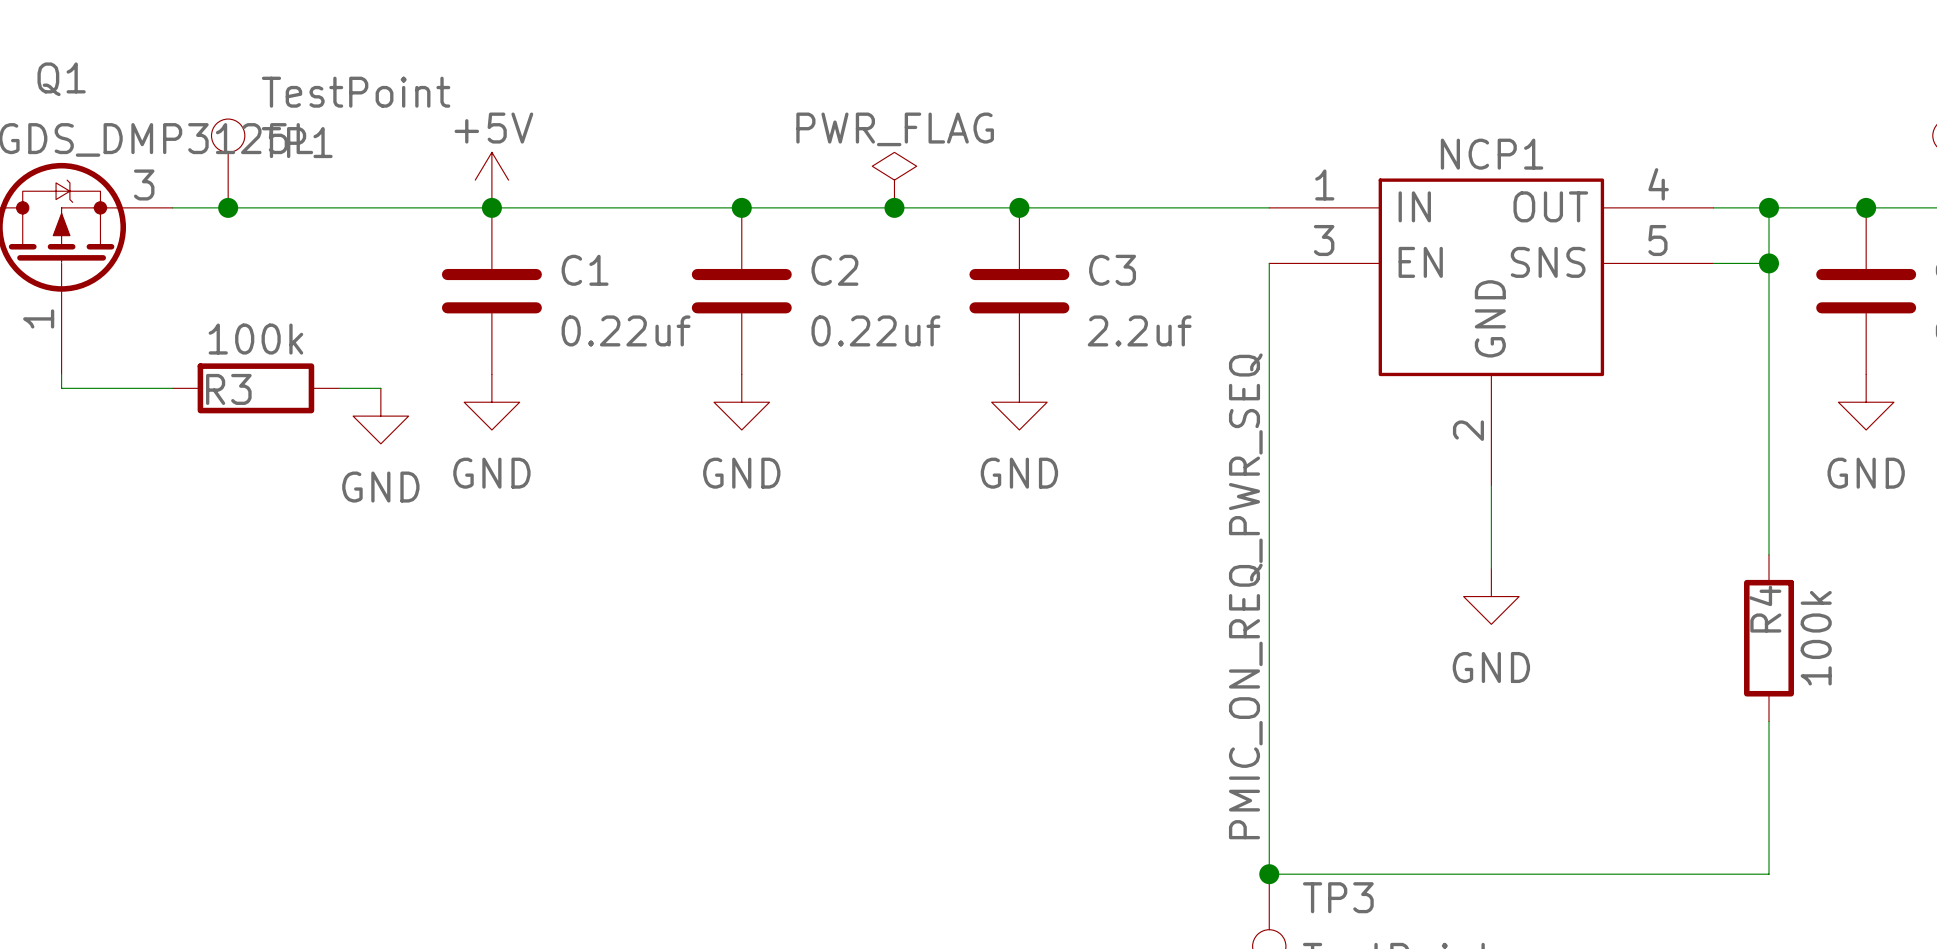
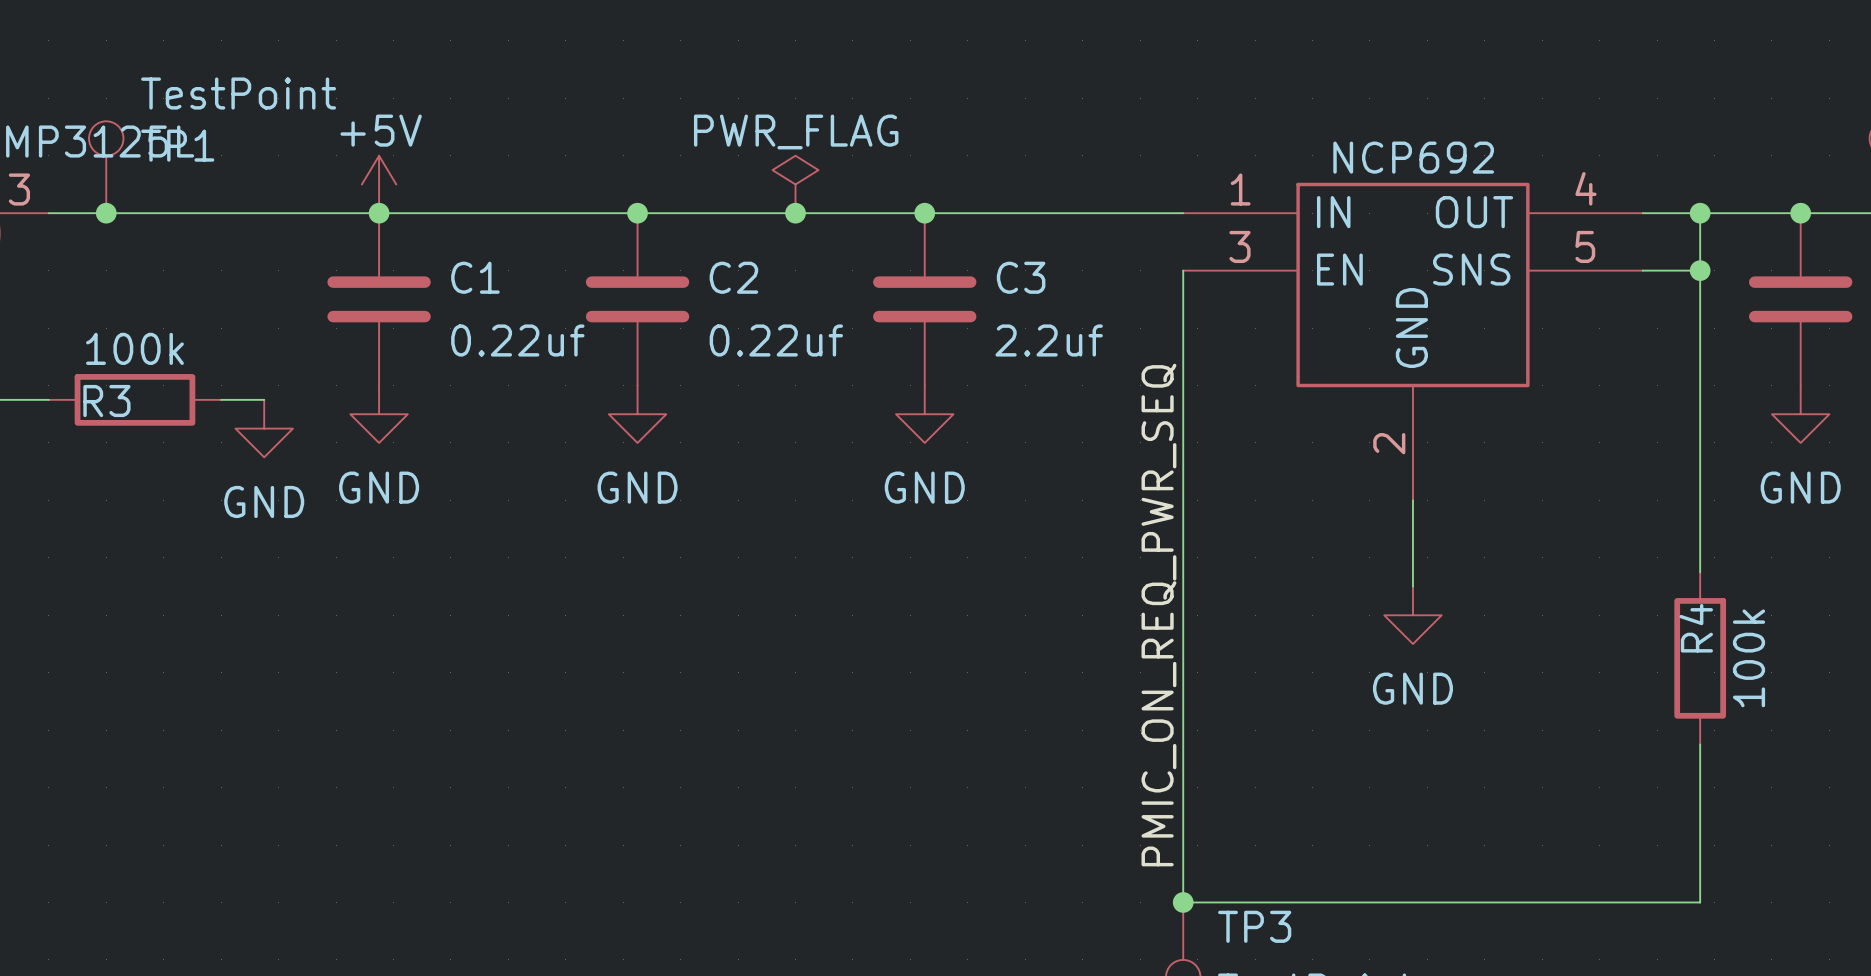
NCP1 name: NCP1 (1492, 154) -> NCP692 (1413, 157)

